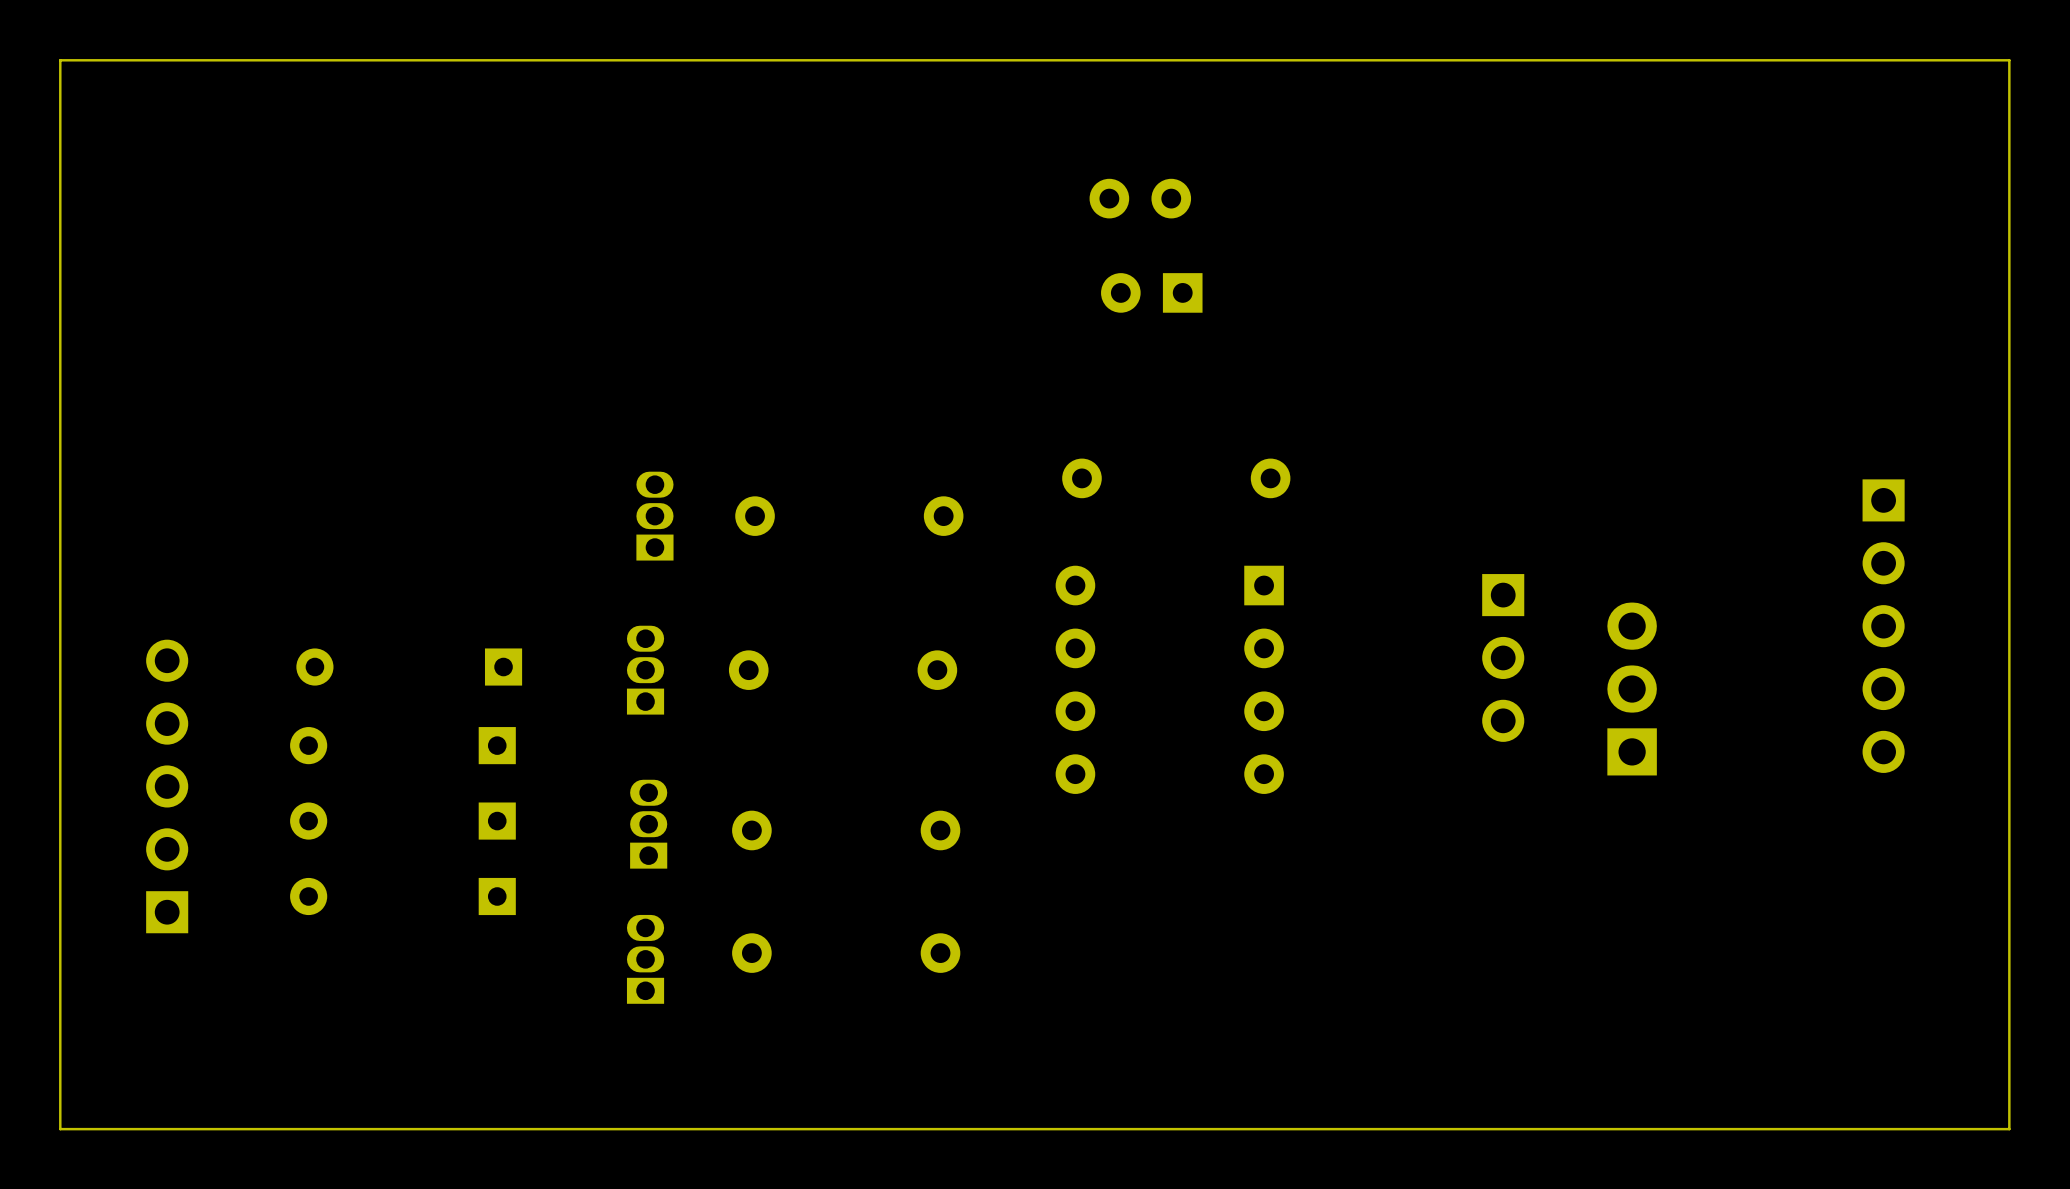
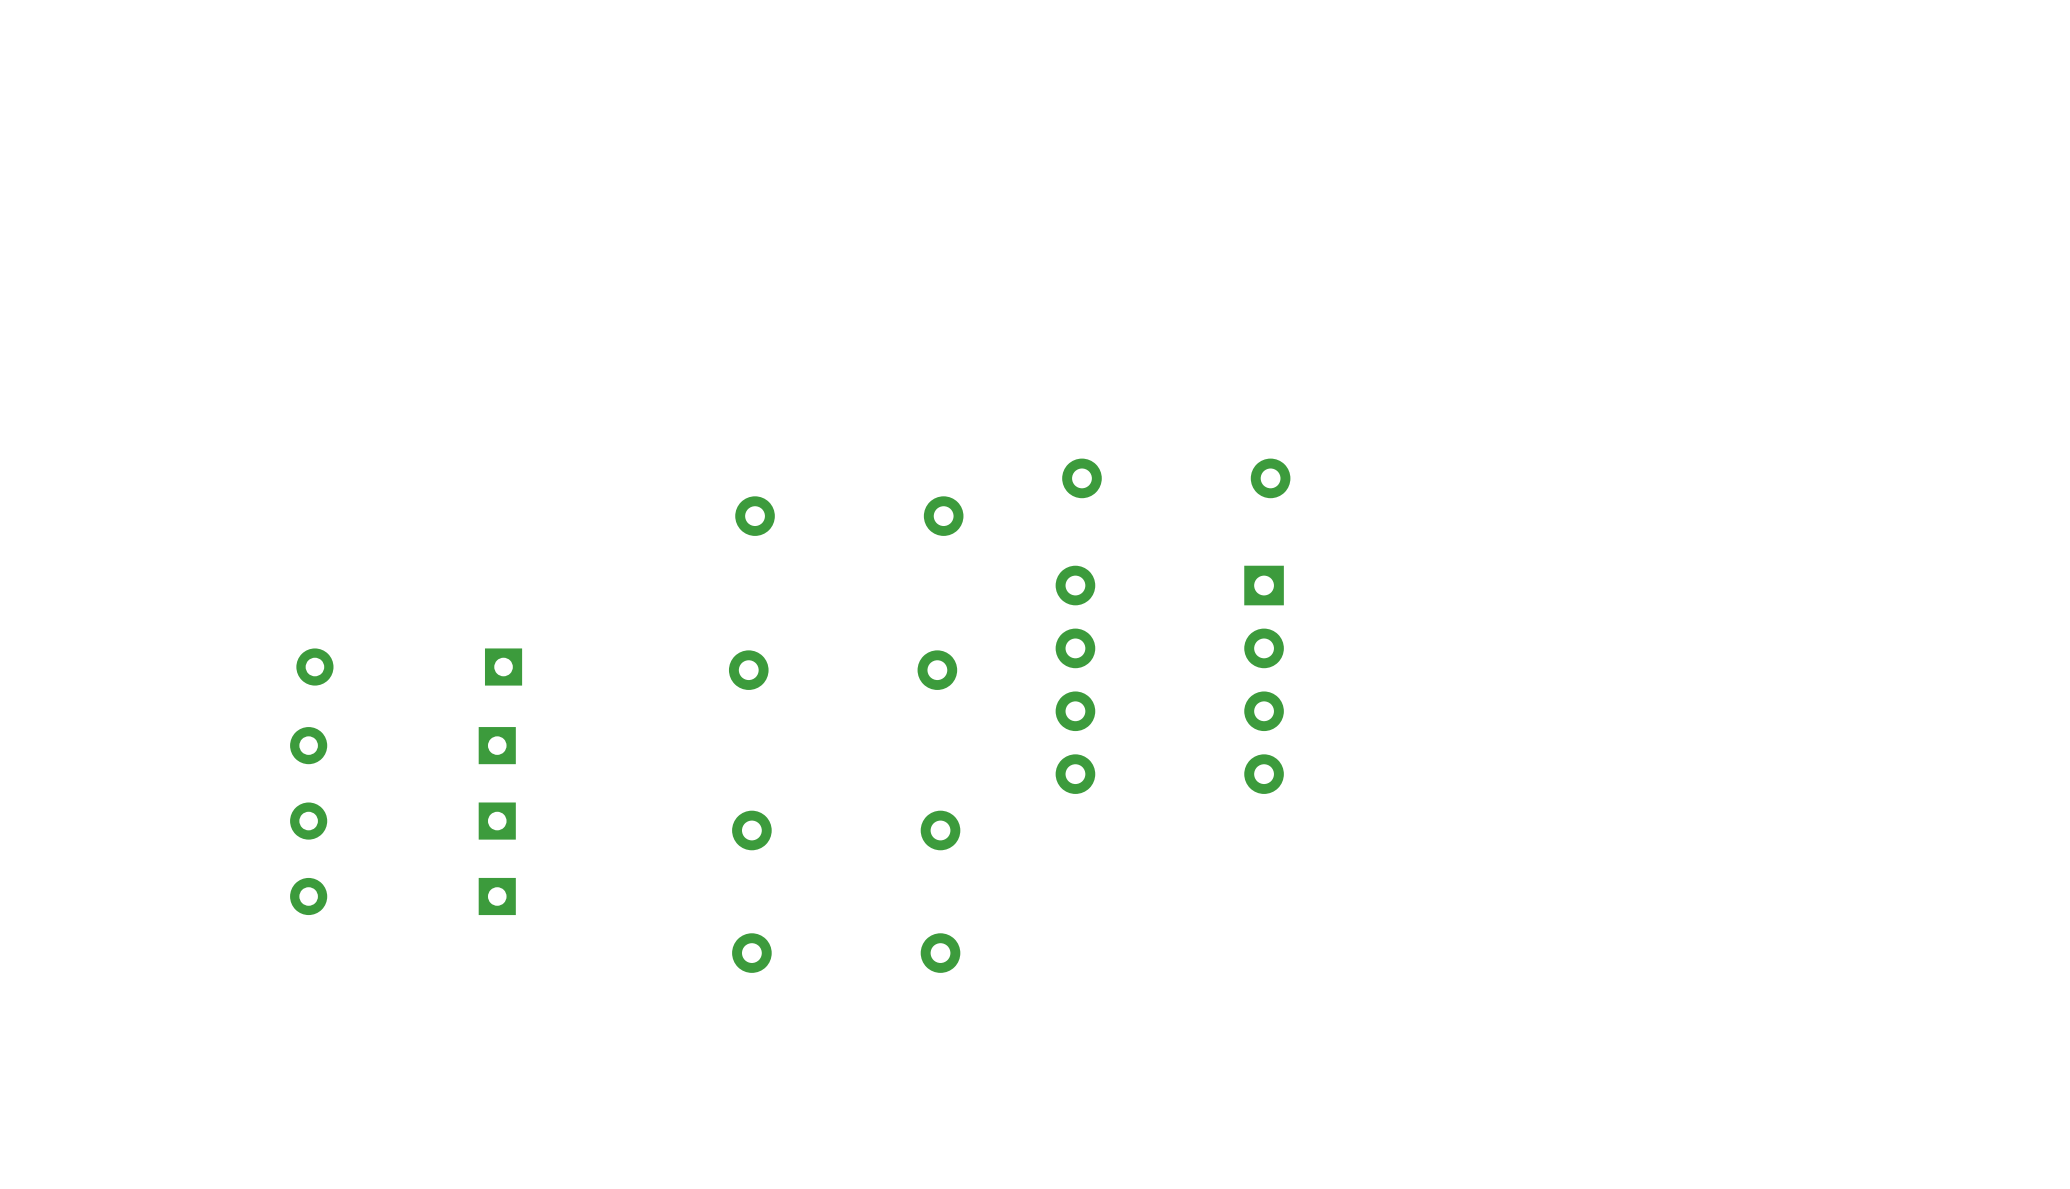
board edge: (2009, 60) (60, 60) (60, 1129) (2009, 1129) (2009, 60) -> none
part: (1140, 198) -> none
part: (1151, 292) -> none
part: (654, 516) -> none
part: (1883, 626) -> none
part: (1503, 657) -> none
part: (645, 670) -> none
part: (1632, 689) -> none
part: (167, 786) -> none
part: (648, 824) -> none
part: (645, 959) -> none

